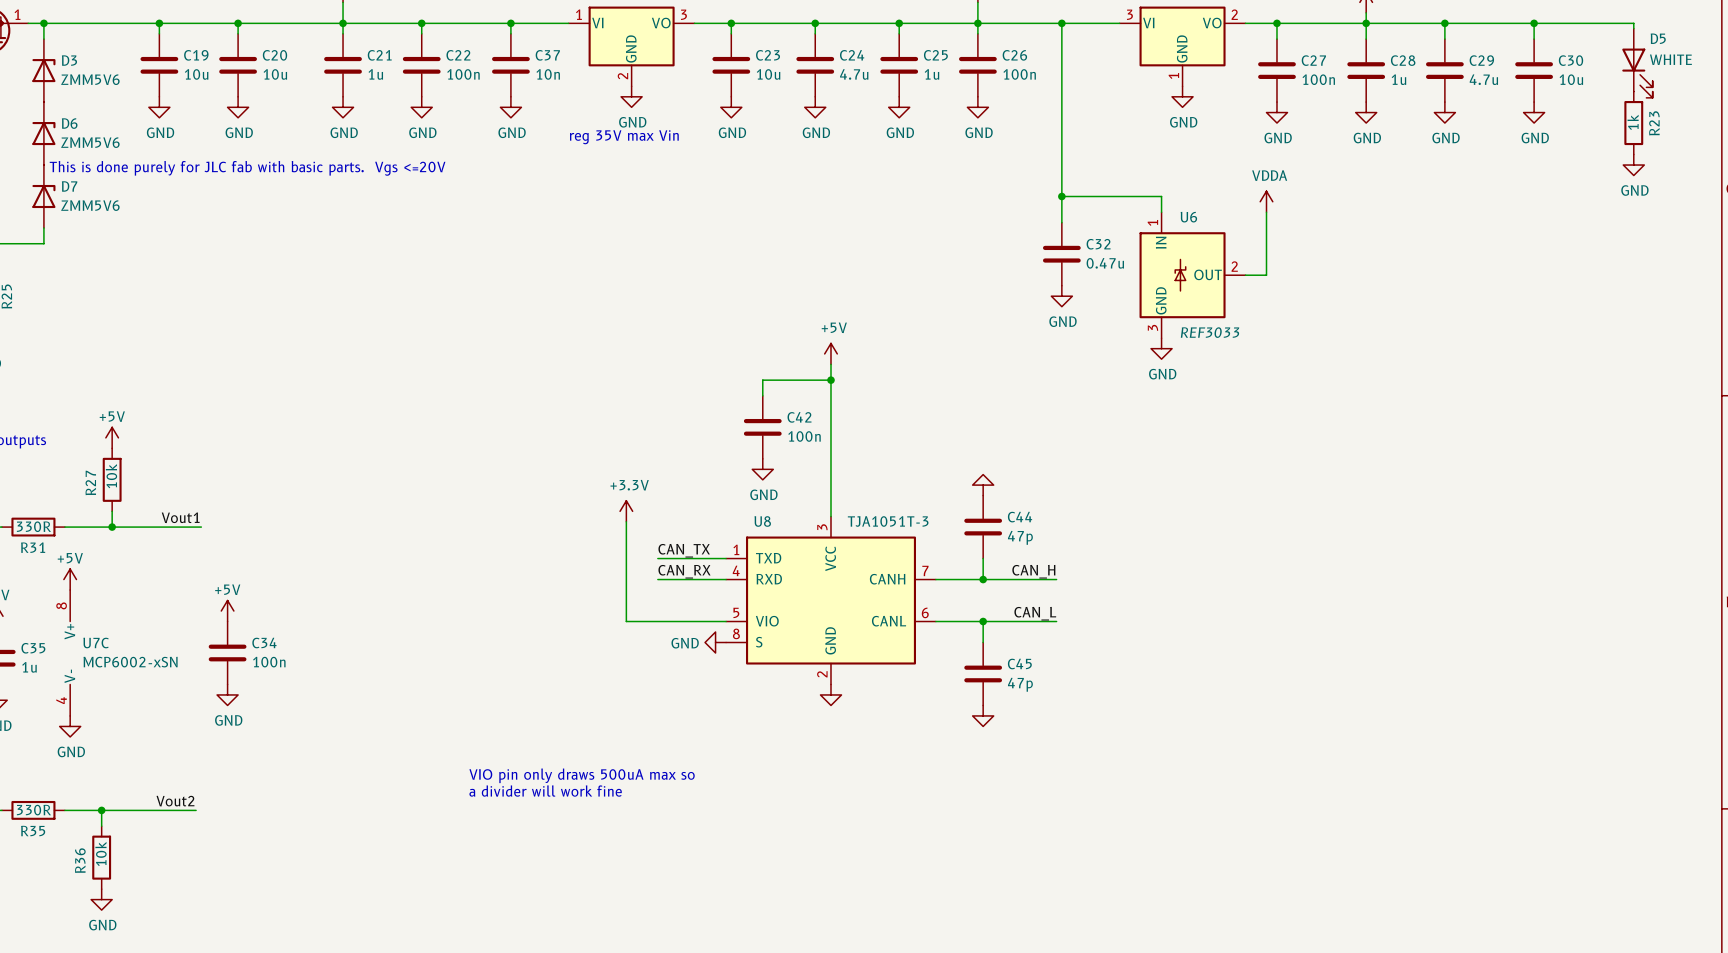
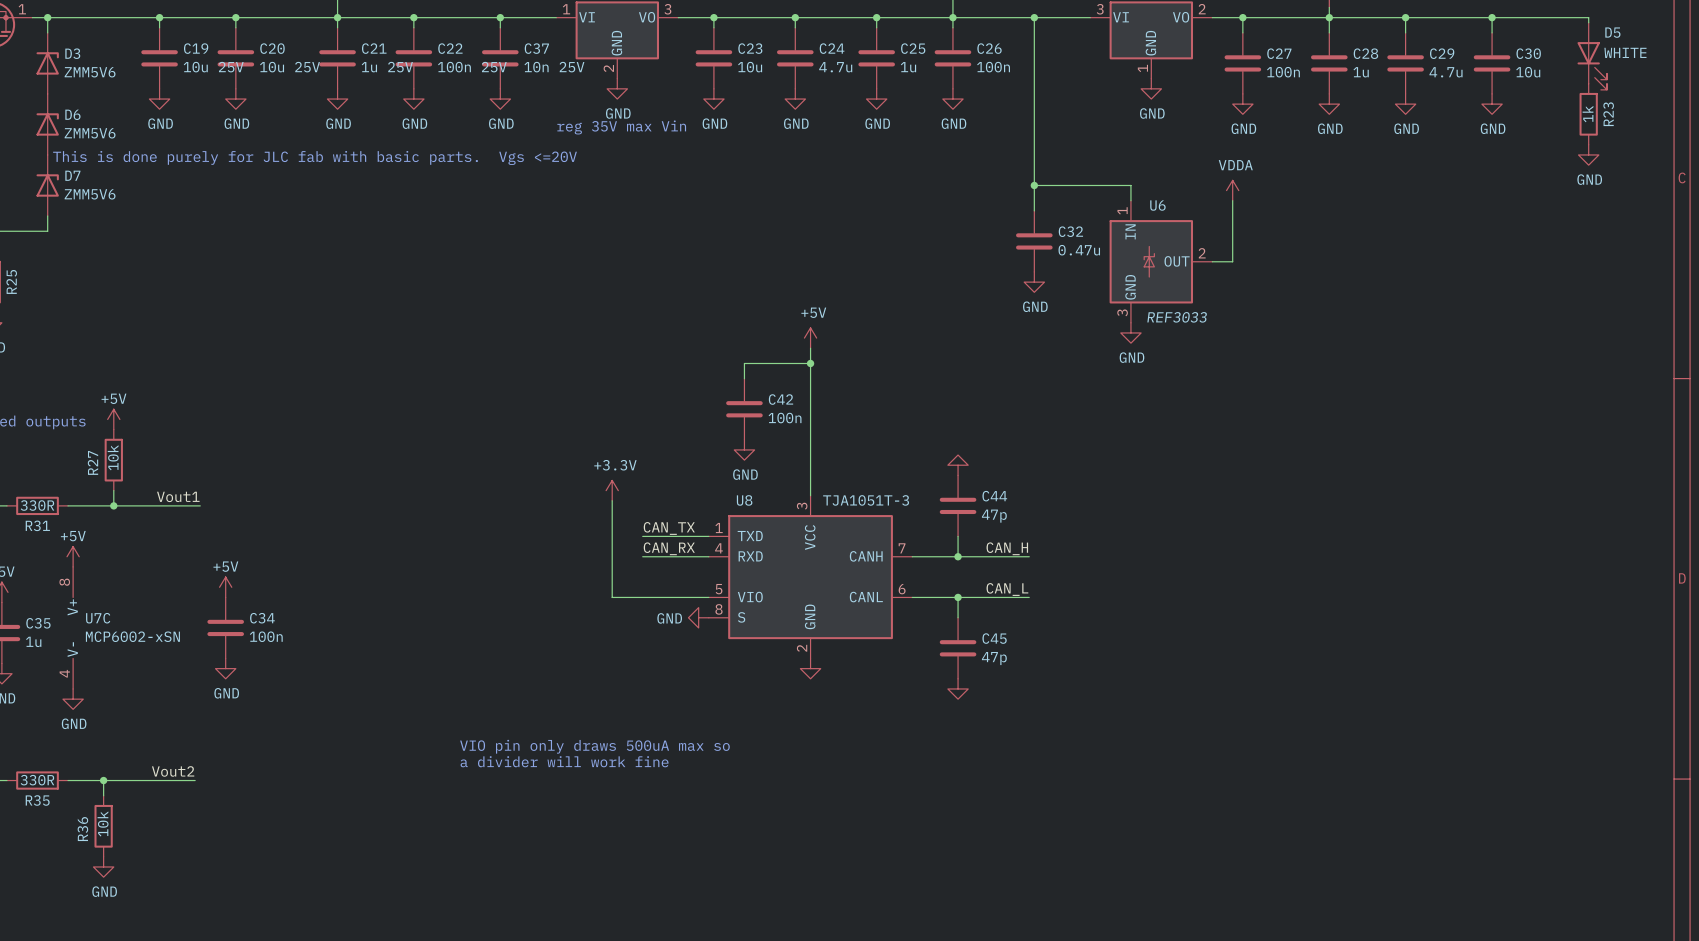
C19 value: 10u (196, 74) -> 10u 25V (213, 67)
C20 value: 10u (275, 74) -> 10u 25V (289, 67)
C21 value: 1u (375, 74) -> 1u 25V (387, 67)
C22 value: 100n (463, 74) -> 100n 25V (472, 67)
C37 value: 10n (548, 74) -> 10n 25V (554, 67)

